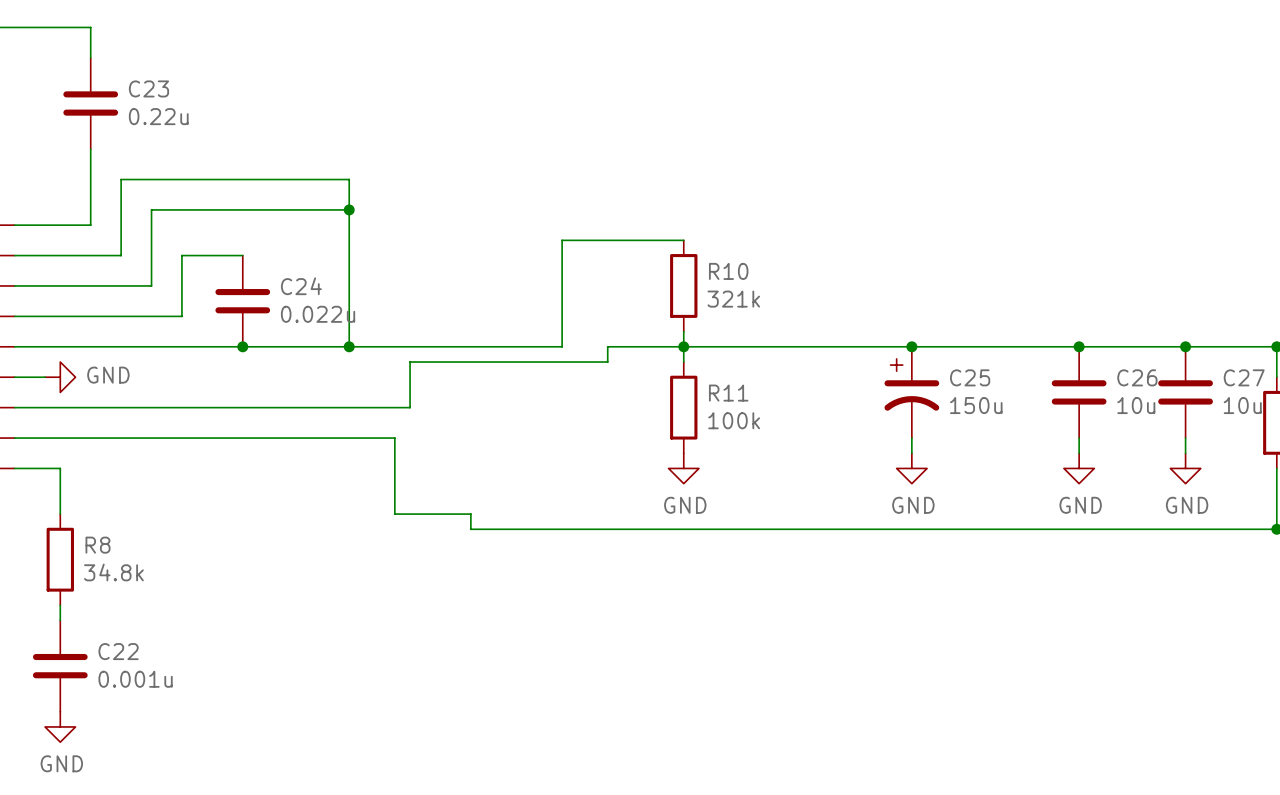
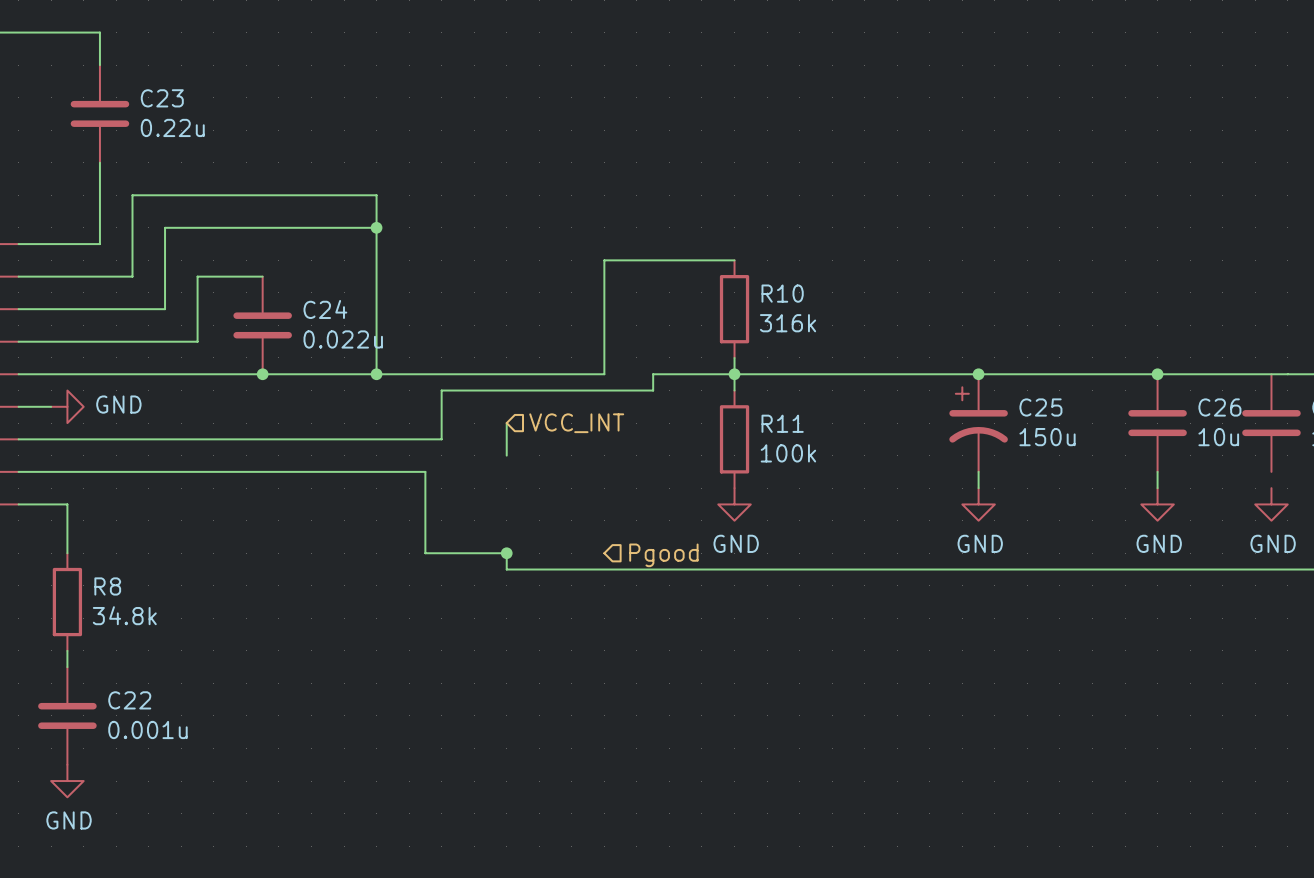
R10 value: 321k (733, 299) -> 316k (788, 323)
junction: (1185, 346) -> none
wire: none -> (506, 423) (506, 455)
hierarchical label: none -> VCC_INT (576, 423)
wire: (1185, 438) (1185, 453) -> none
junction: none -> (506, 553)
hierarchical label: none -> Pgood (663, 555)

